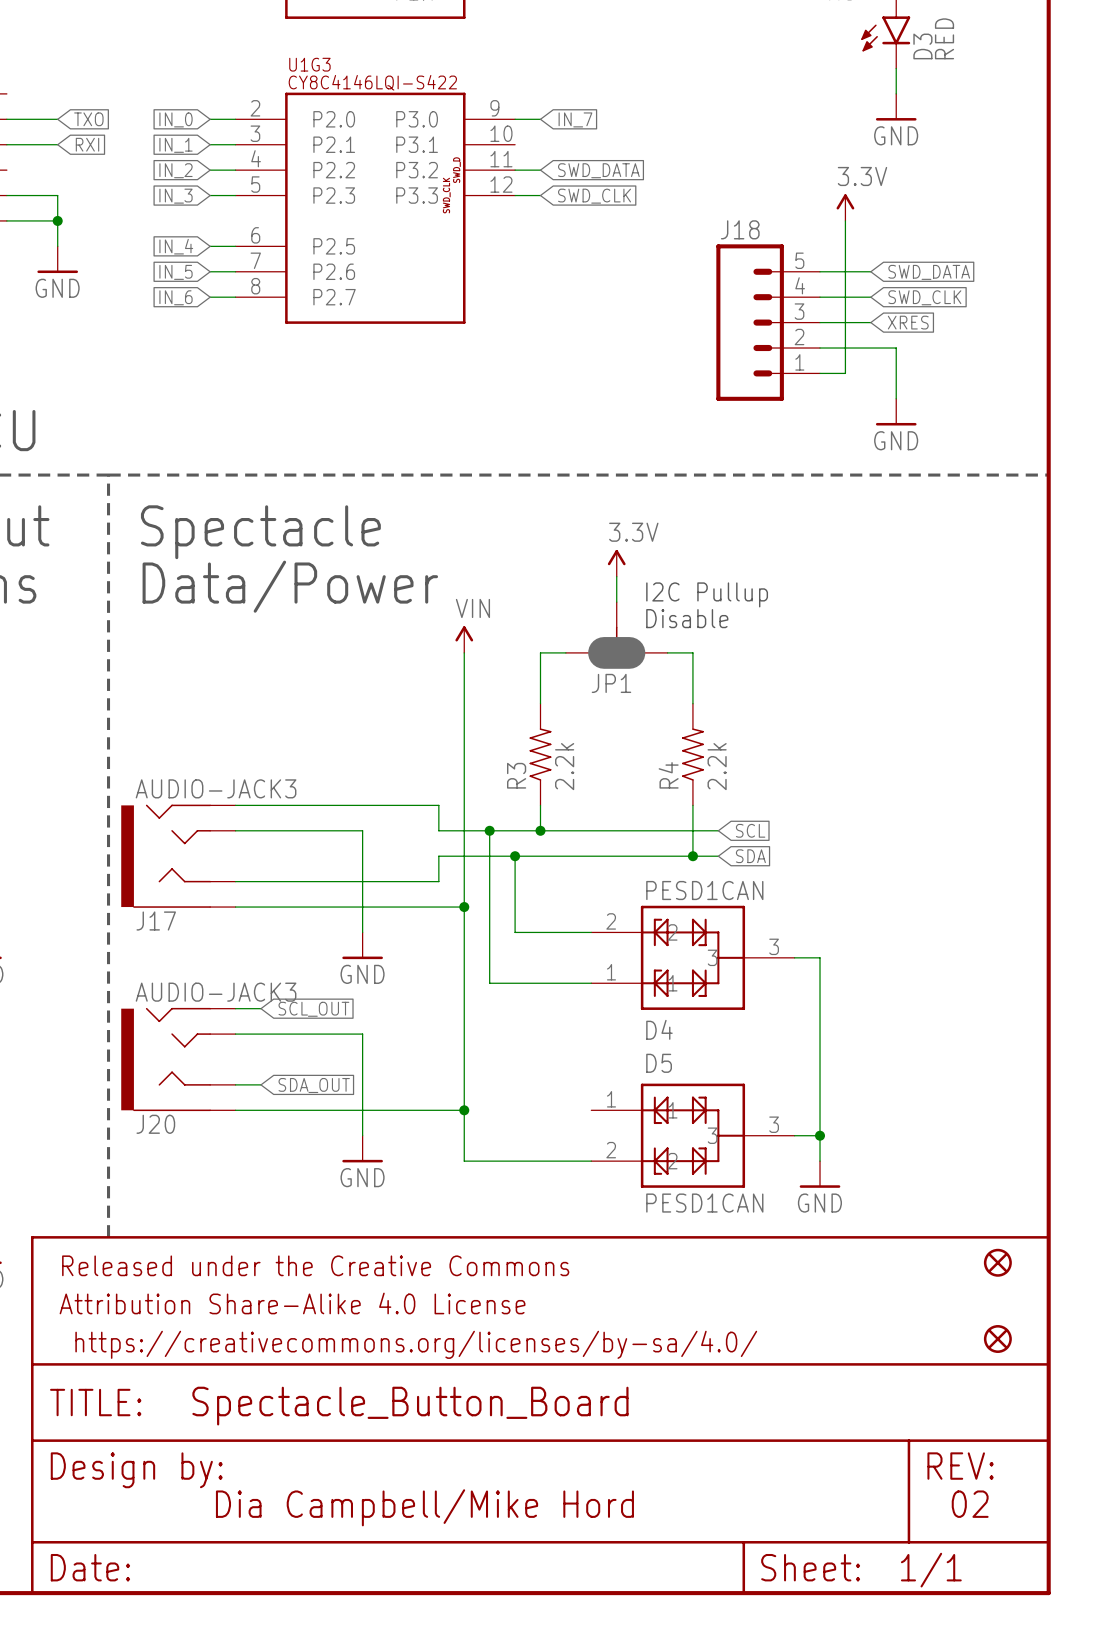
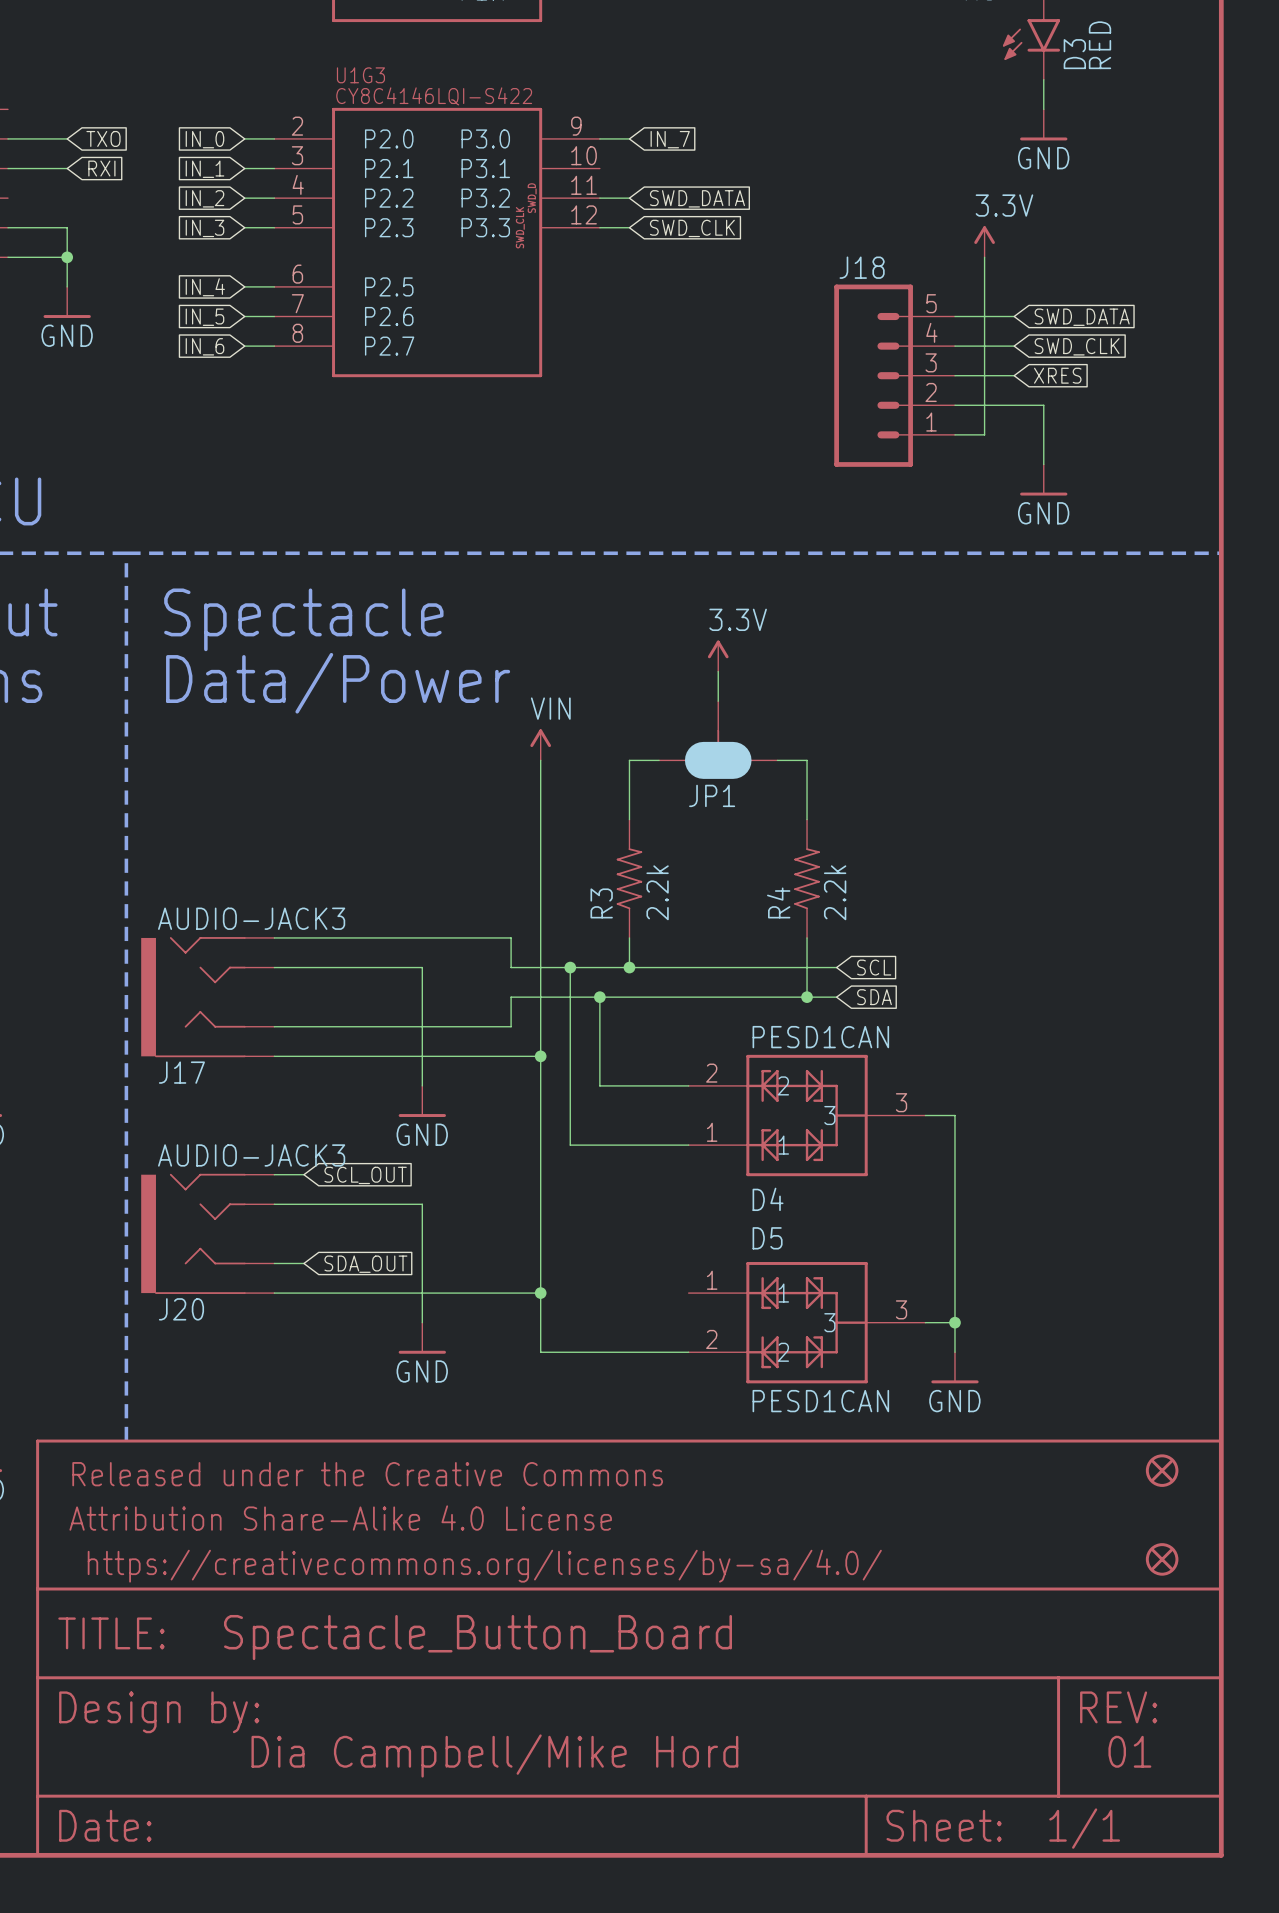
text: I2C Pullup (707, 594) -> none
text: Disable (687, 618) -> none
text: 02 (970, 1504) -> 01 (1129, 1751)

